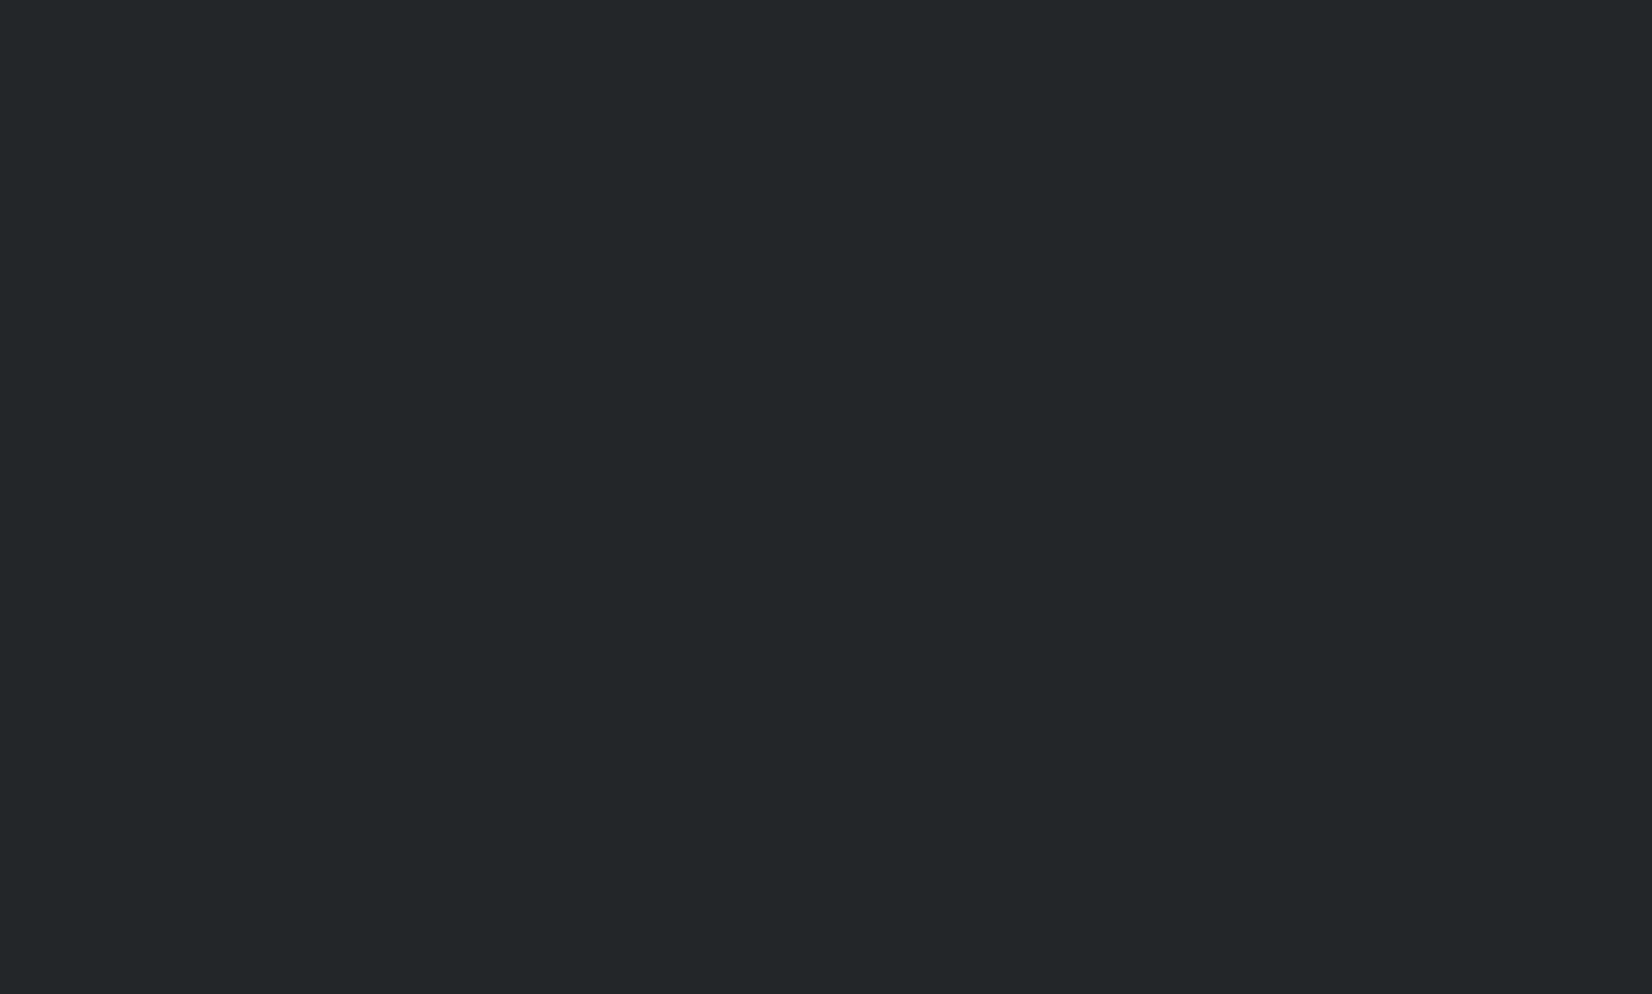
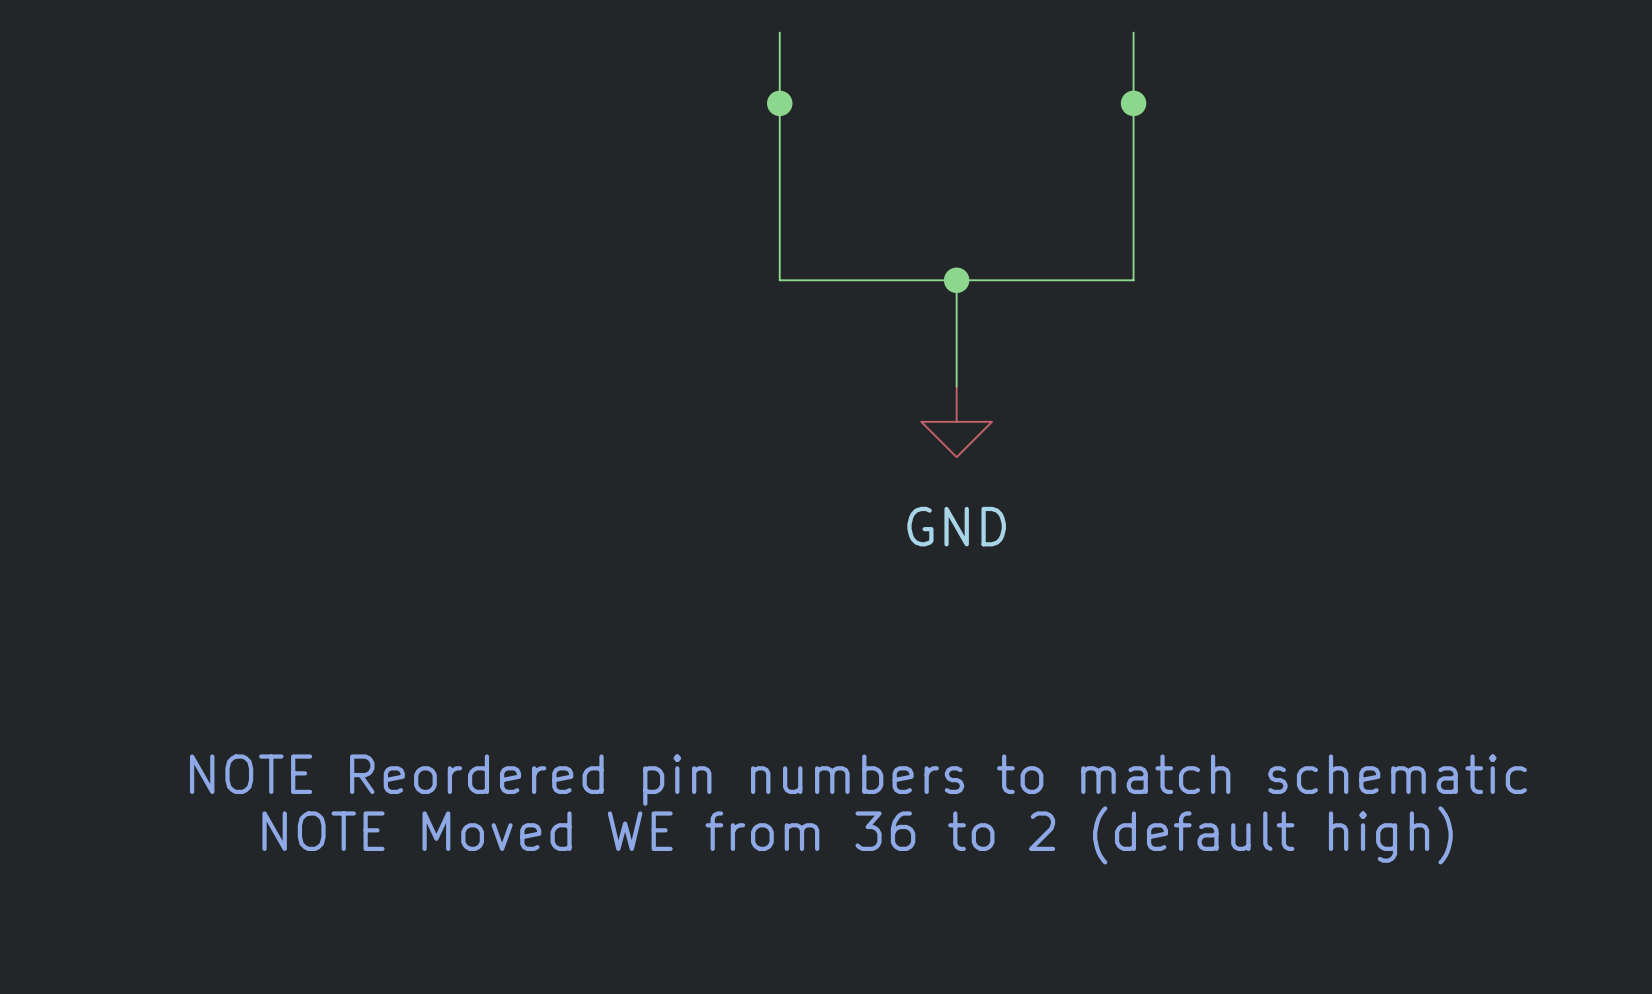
wire: none -> (779, 32) (779, 280) (1133, 280) (1133, 32)
junction: none -> (779, 103)
junction: none -> (1133, 103)
wire: none -> (956, 280) (956, 386)
junction: none -> (956, 280)
power symbol: none -> GND (956, 421)
text: none -> NOTE Reordered pin numbers to match schematic (858, 780)
text: none -> NOTE Moved WE from 36 to 2 (default high) (857, 835)

